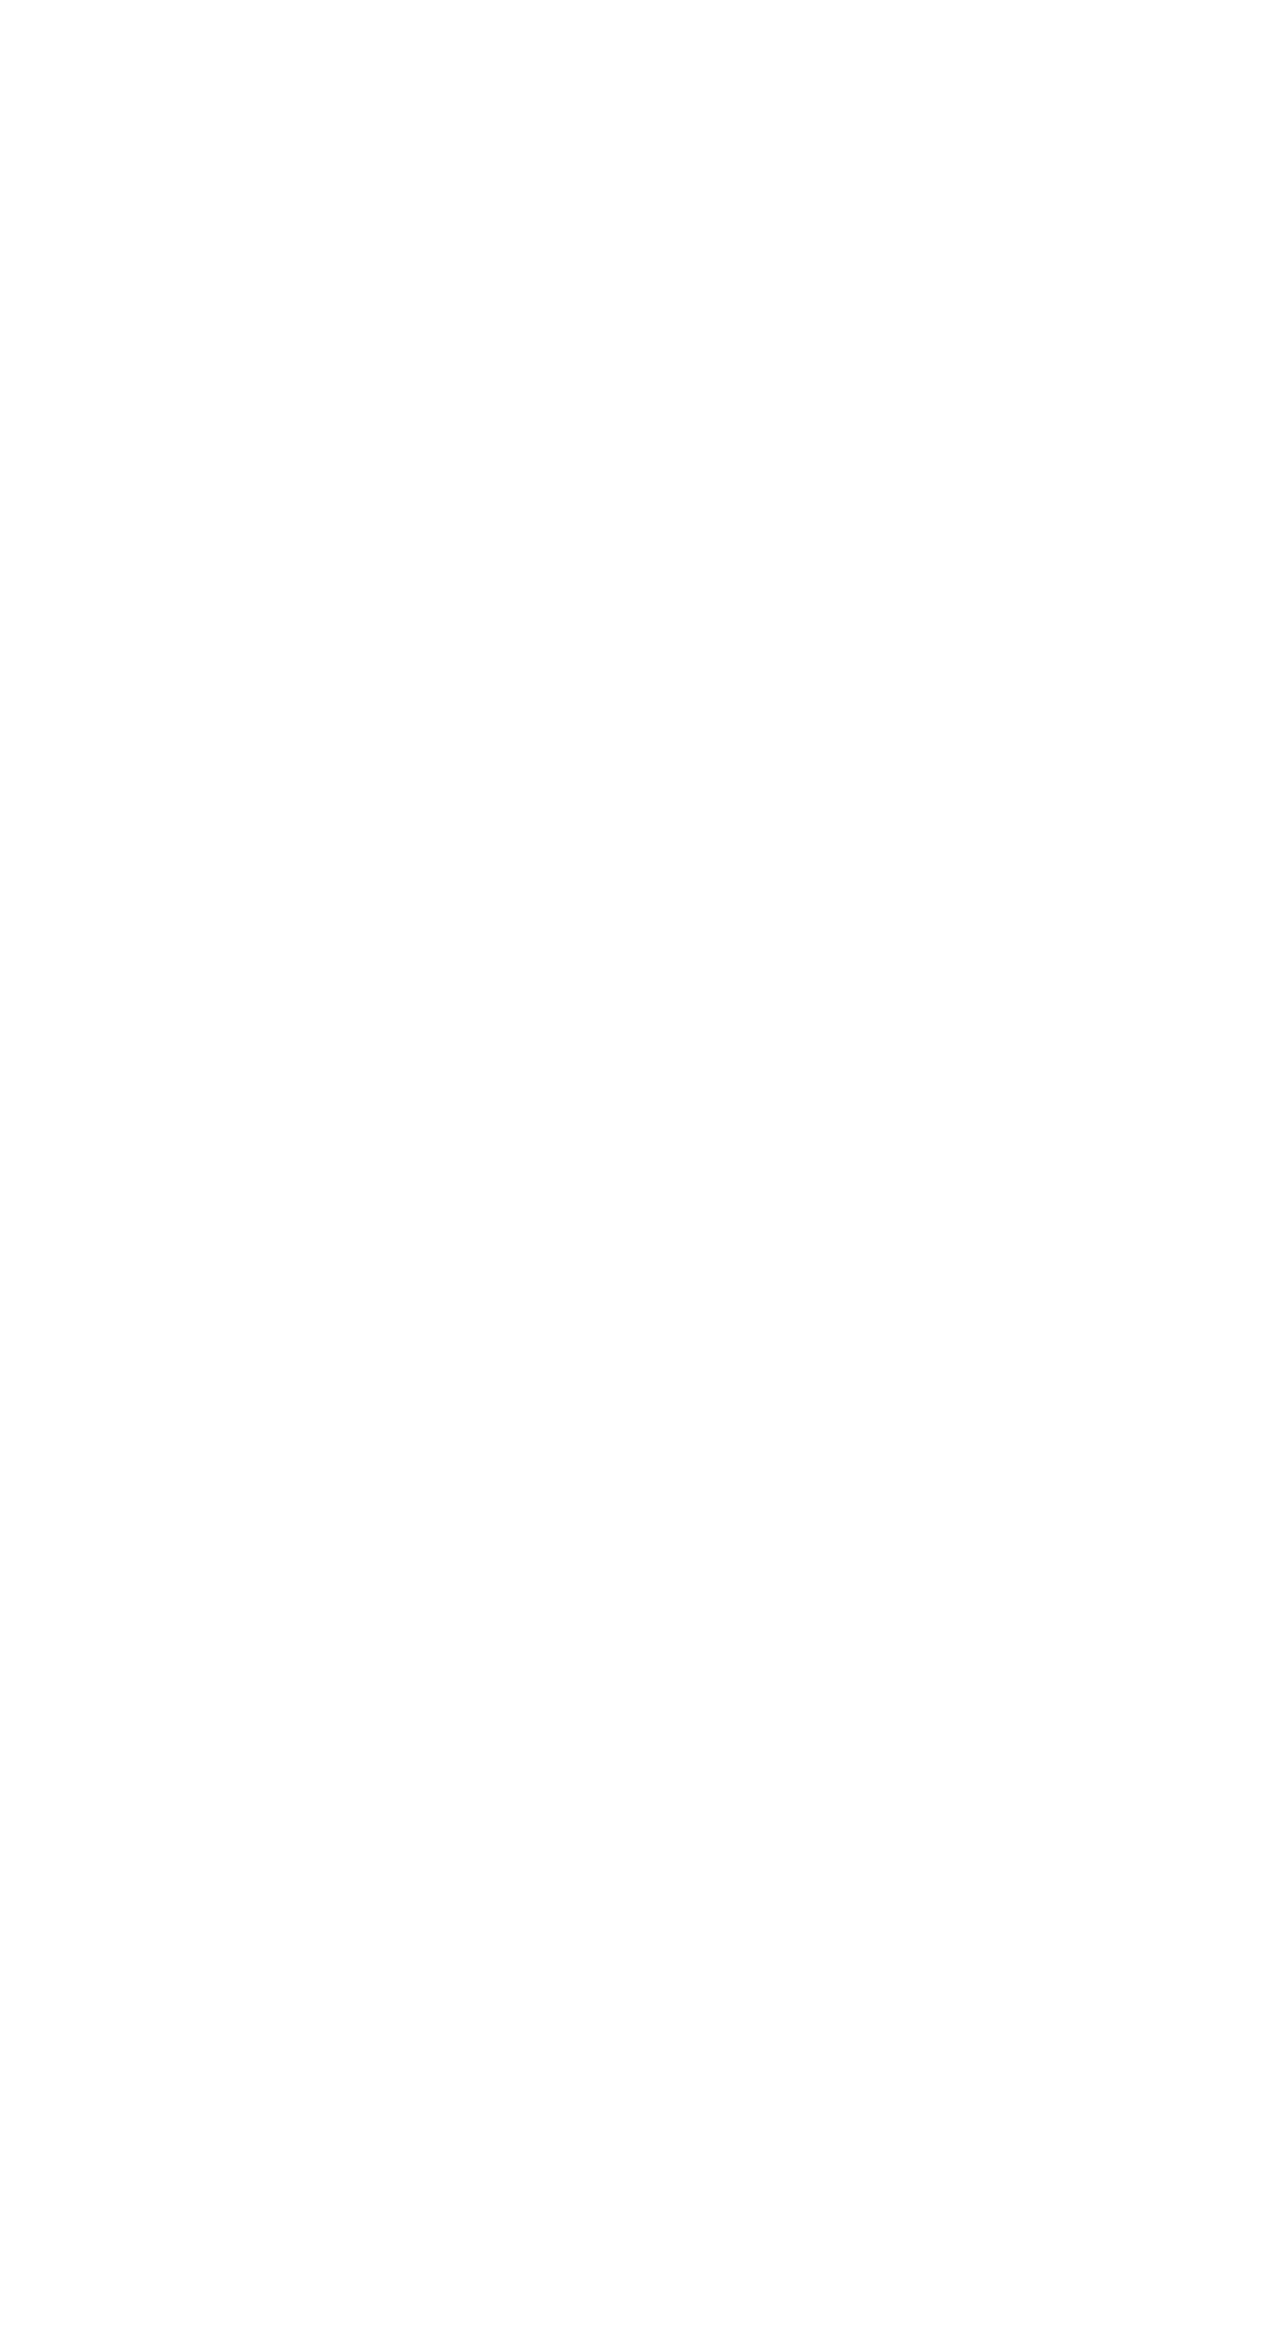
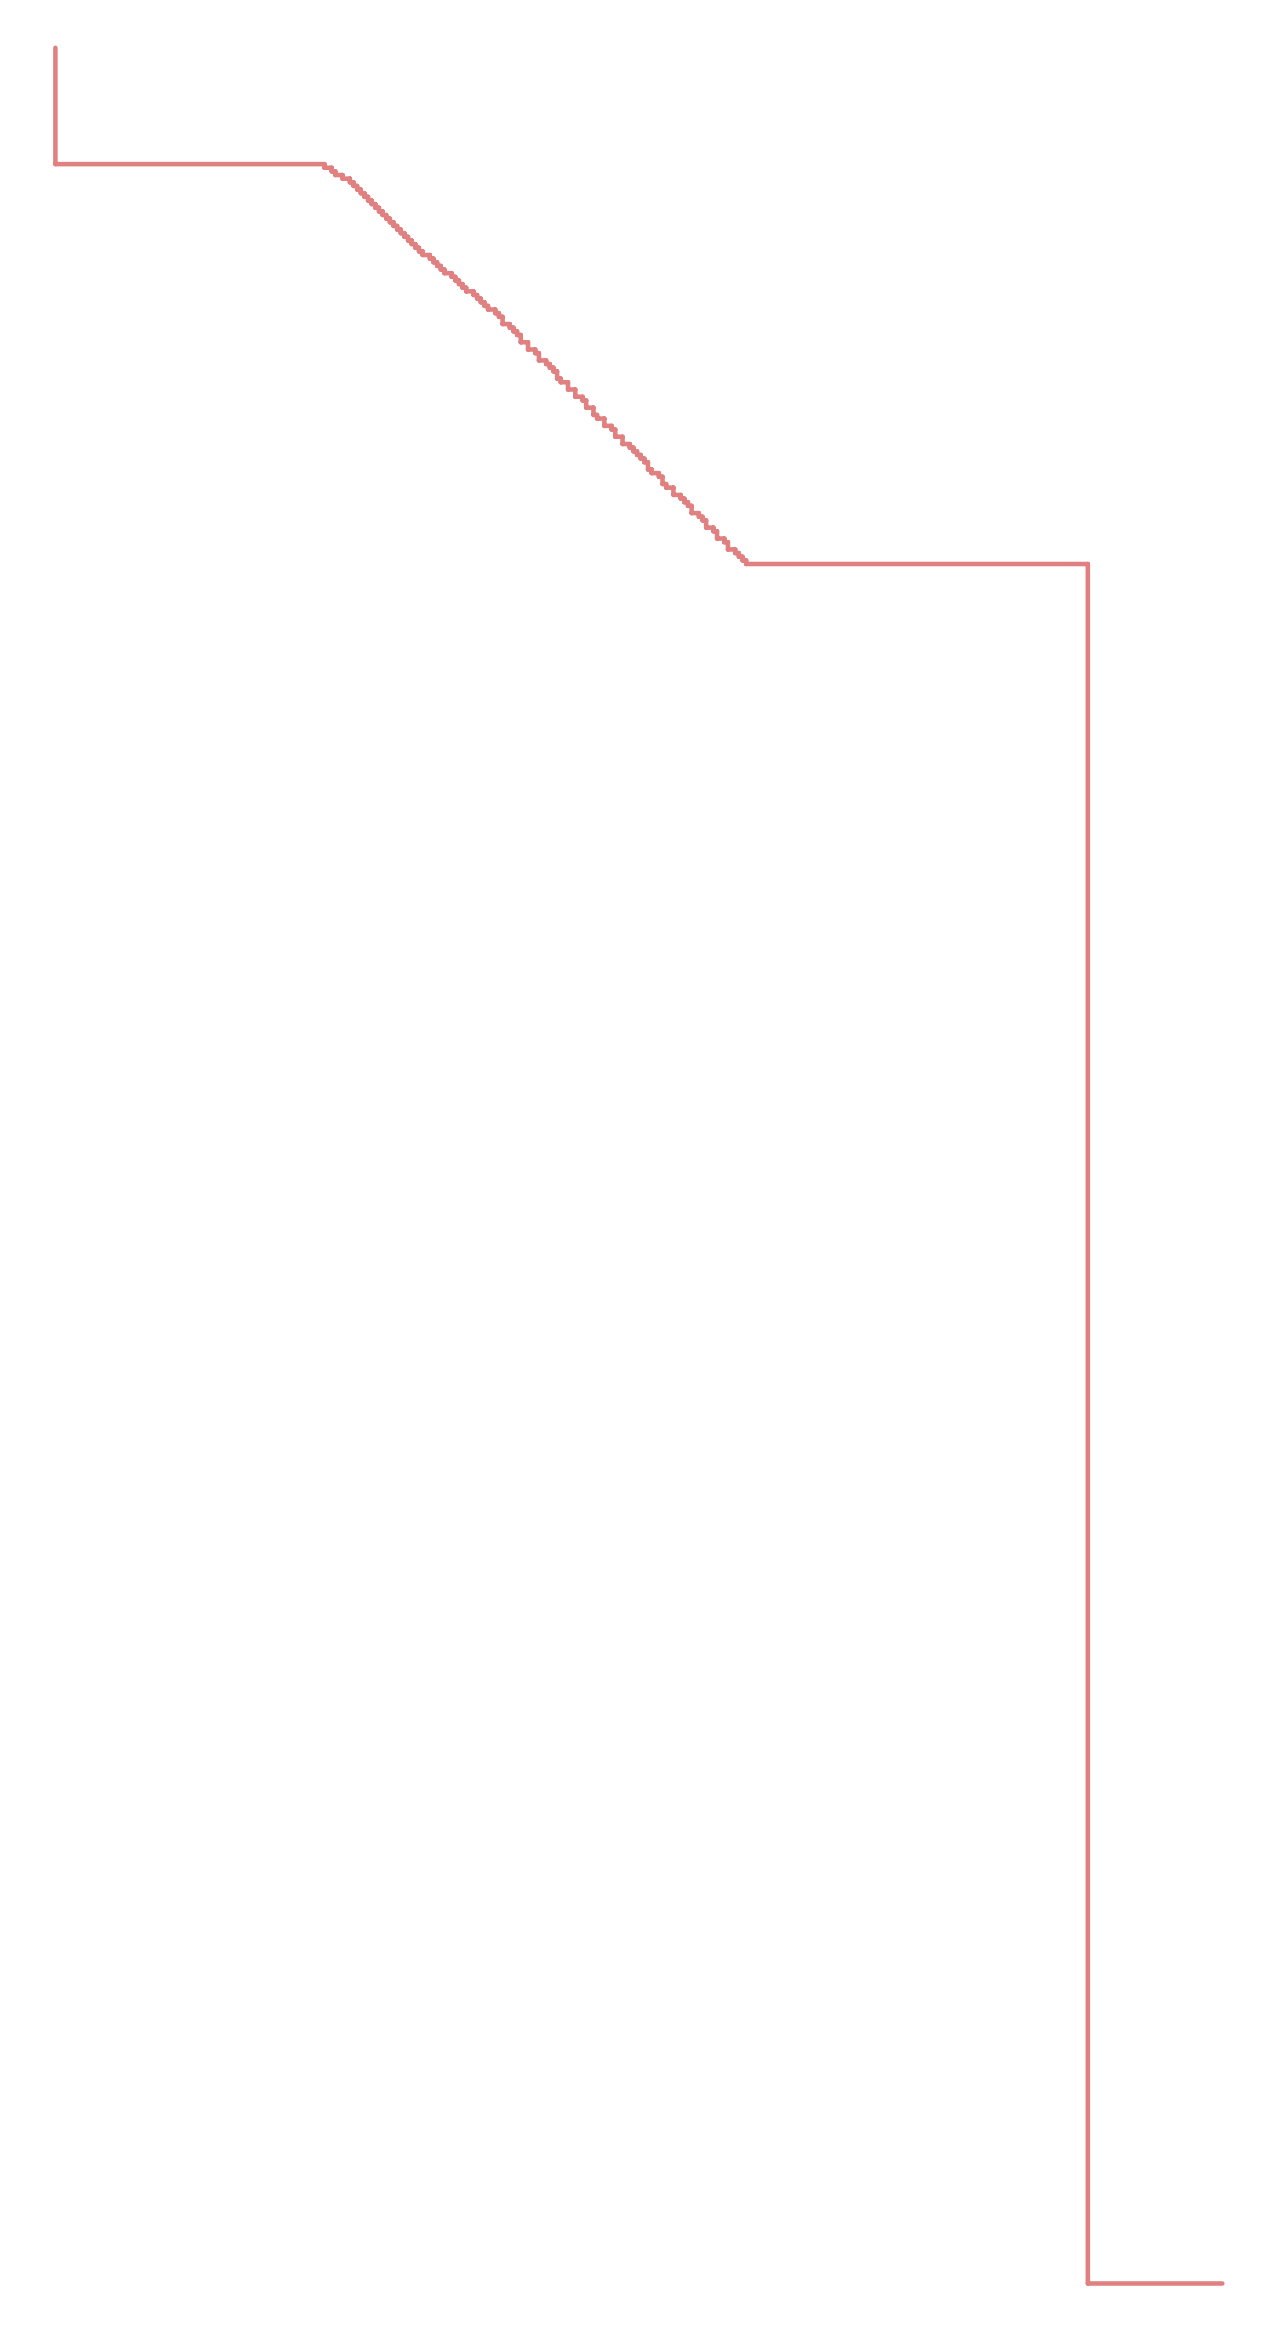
top track: none -> (55, 47) (55, 164) (324, 164) (324, 167) (331, 167) (331, 171) (335, 171) (335, 175) (342, 175) (342, 178) (349, 178) (349, 182) (353, 182) (353, 185) (357, 185) (357, 189) (360, 189) (360, 193) (364, 193) (364, 196) (368, 196) (368, 200) (371, 200) (371, 204) (375, 204) (375, 207) (378, 207) (378, 211) (382, 211) (382, 215) (386, 215) (386, 218) (389, 218) (389, 222) (393, 222) (393, 225) (397, 225) (397, 229) (400, 229) (400, 233) (404, 233) (404, 236) (408, 236) (408, 240) (411, 240) (411, 244) (415, 244) (415, 247) (418, 247) (418, 251) (422, 251) (422, 254) (429, 254) (429, 258) (433, 258) (433, 262) (437, 262) (437, 265) (440, 265) (440, 269) (444, 269) (444, 273) (451, 273) (451, 276) (455, 276) (455, 280) (458, 280) (458, 284) (462, 284) (462, 287) (466, 287) (466, 291) (473, 291) (473, 294) (477, 294) (477, 298) (480, 298) (480, 302) (484, 302) (484, 305) (488, 305) (488, 309) (495, 309) (495, 313) (498, 313) (498, 316) (502, 316) (502, 324) (509, 324) (509, 327) (513, 327) (513, 331) (517, 331) (517, 334) (520, 334) (520, 342) (528, 342) (528, 349) (535, 349) (535, 353) (538, 353) (538, 360) (546, 360) (546, 364) (549, 364) (549, 367) (553, 367) (553, 371) (557, 371) (557, 378) (560, 378) (560, 382) (567, 382) (567, 389) (575, 389) (575, 396) (582, 396) (582, 400) (586, 400) (586, 407) (593, 407) (593, 414) (597, 414) (597, 418) (604, 418) (604, 425) (611, 425) (611, 429) (615, 429) (615, 436) (622, 436) (622, 444) (629, 444) (629, 447) (633, 447) (633, 451) (637, 451) (637, 454) (640, 454) (640, 458) (644, 458) (644, 462) (647, 462) (647, 469) (651, 469) (651, 473) (658, 473) (658, 476) (662, 476) (662, 484) (666, 484) (666, 487) (673, 487) (673, 494) (680, 494) (680, 498) (684, 498) (684, 502) (687, 502) (687, 505) (691, 505) (691, 513) (698, 513) (698, 516) (702, 516) (702, 520) (706, 520) (706, 527) (713, 527) (713, 531) (717, 531) (717, 538) (724, 538) (724, 542) (727, 542) (727, 549) (735, 549) (735, 553) (738, 553) (738, 556) (742, 556) (742, 560) (746, 560) (746, 563) (1087, 563) (1087, 2283) (1222, 2283)

